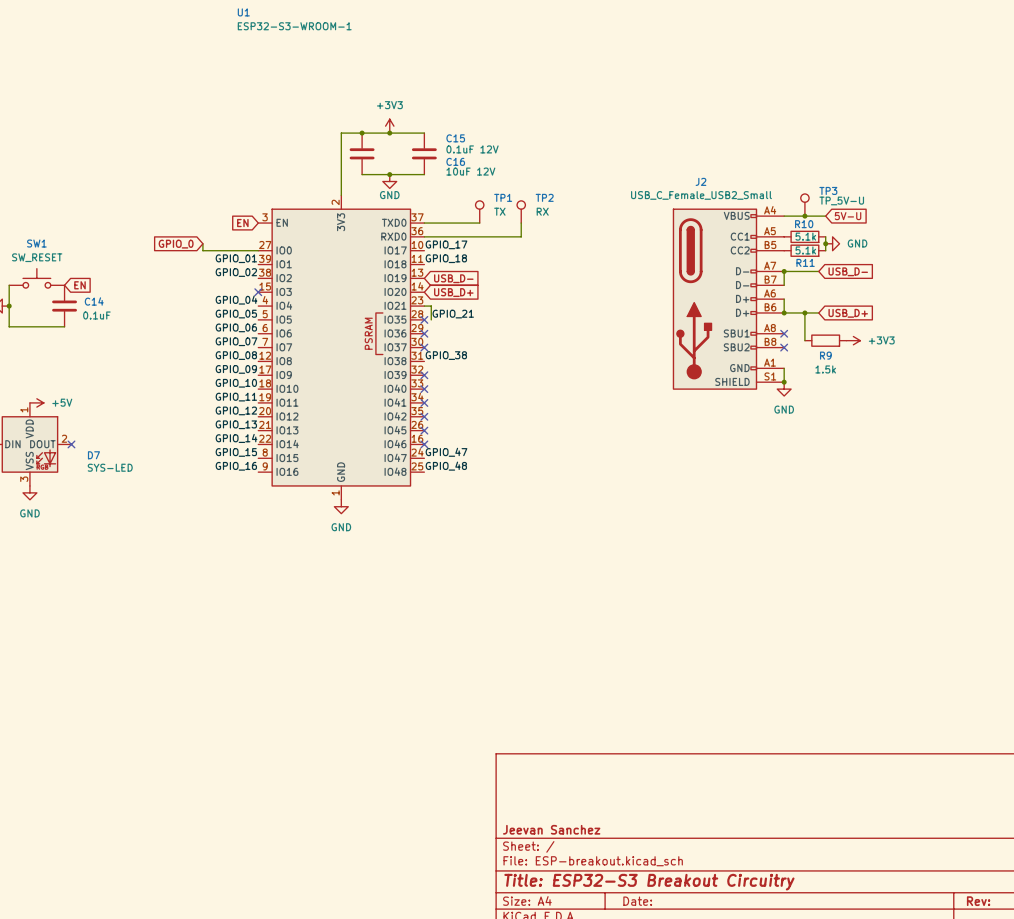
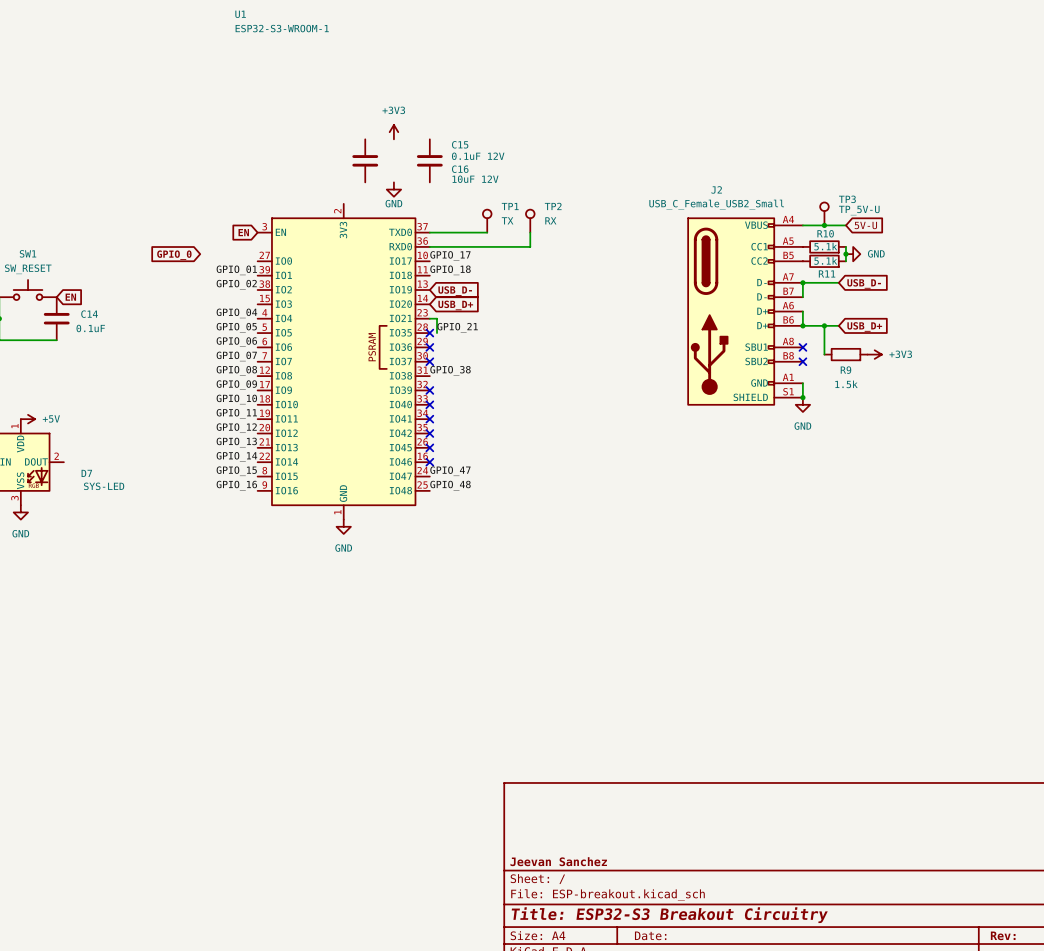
junction: (362, 133) -> none
junction: (389, 133) -> none
wire: (424, 133) (341, 133) (341, 195) -> none
wire: (362, 174) (424, 174) -> none
junction: (389, 174) -> none
wire: (202, 243) (202, 250) (258, 250) -> none
no-connect mark: (258, 292) -> none
no-connect mark: (71, 444) -> none

